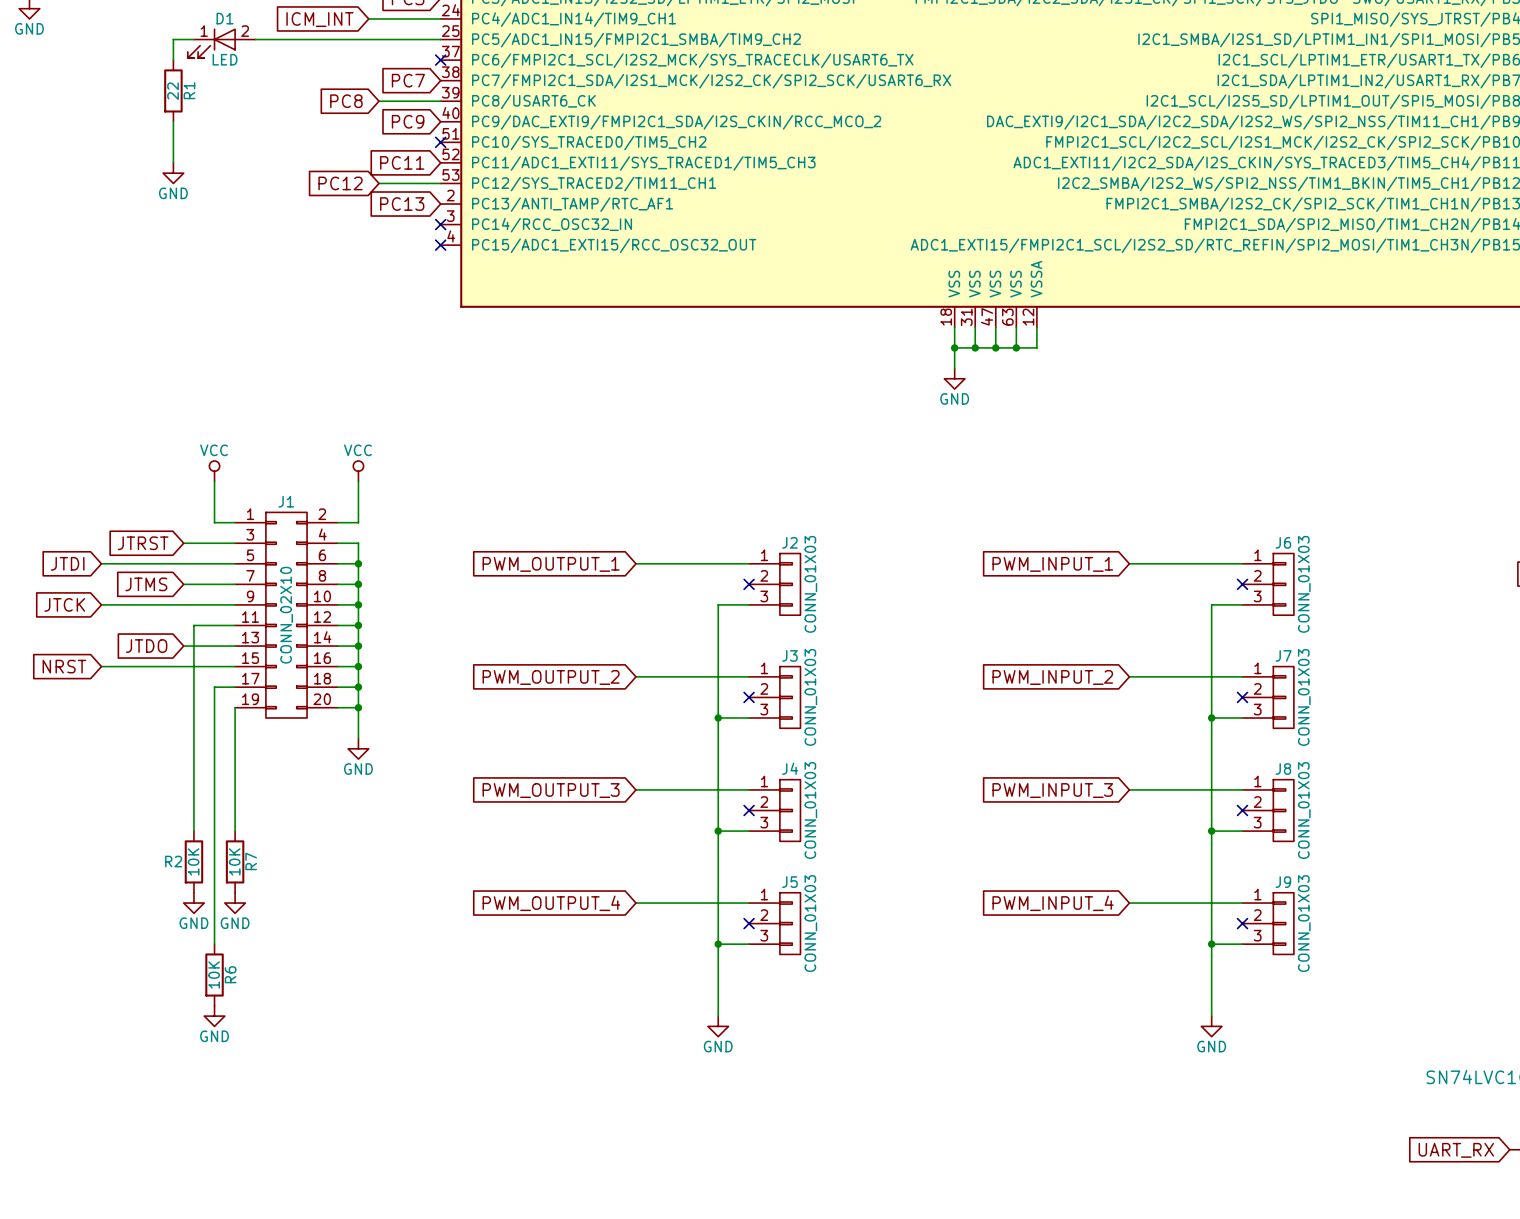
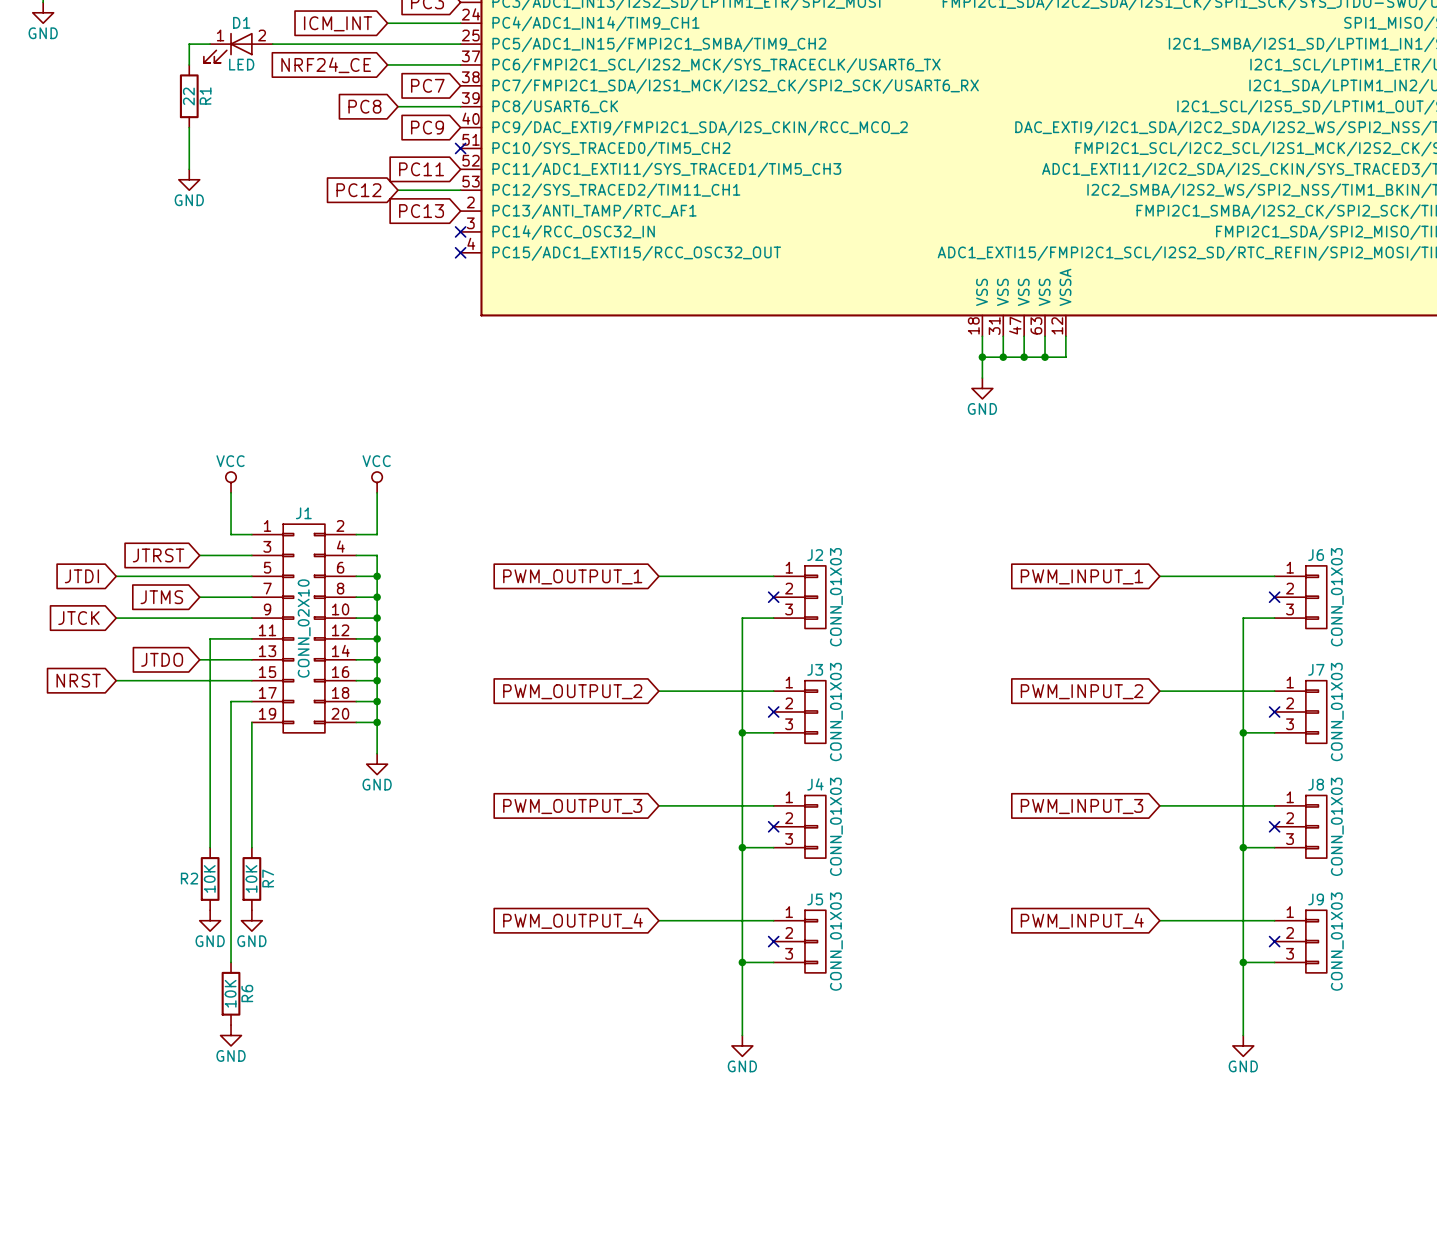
global label: none -> NRF24_CE (326, 65)
wire: none -> (387, 64) (460, 64)
no-connect mark: (440, 60) -> none

